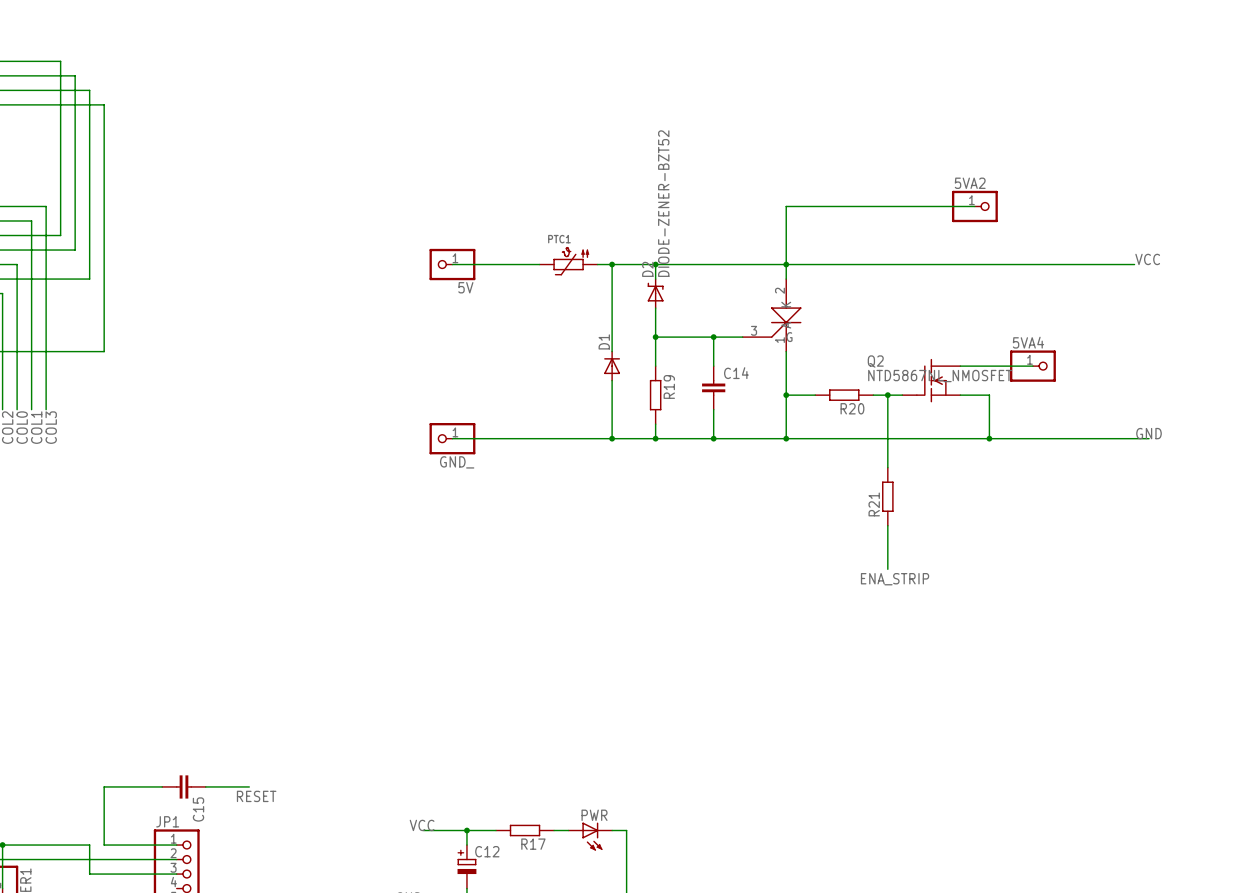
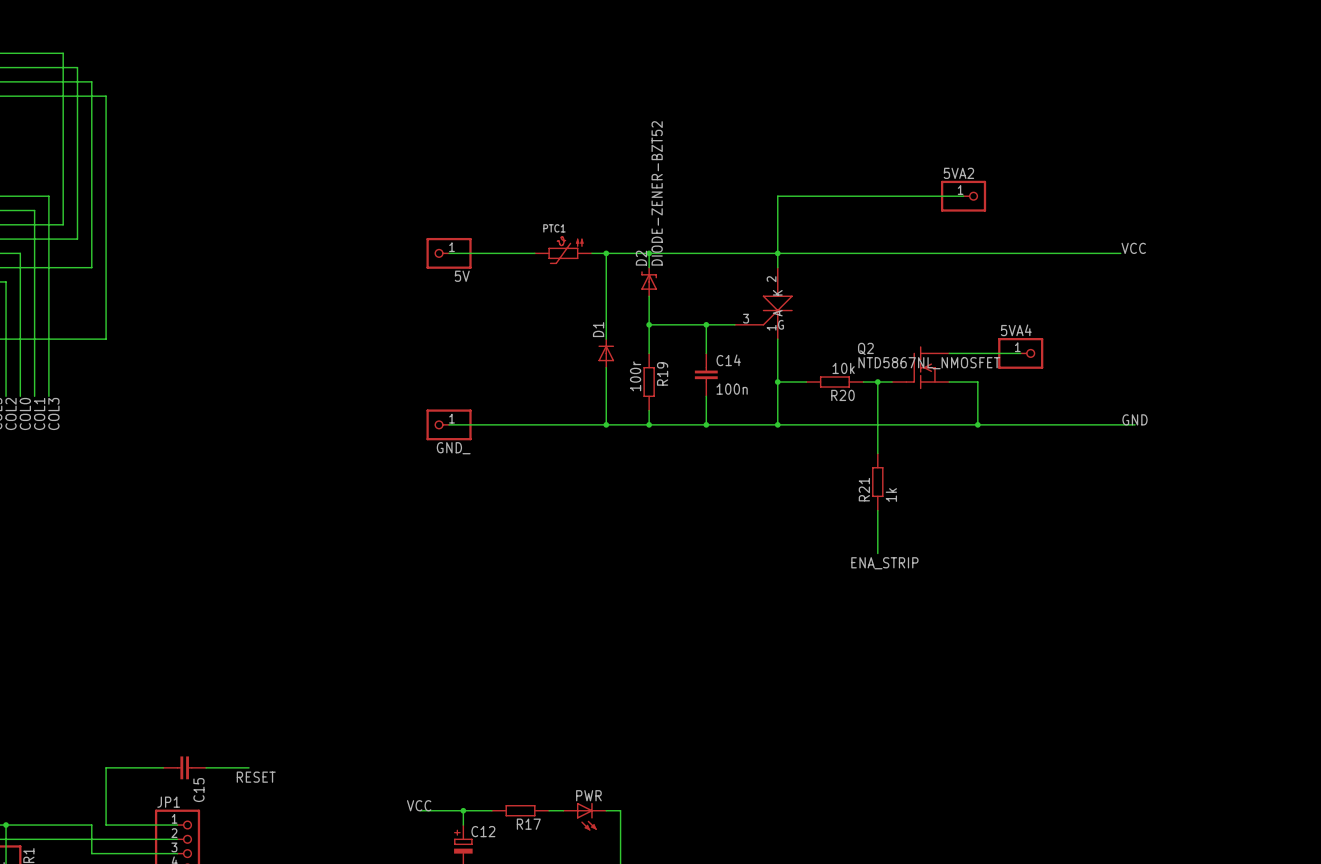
R20 value: none -> 10k (843, 368)
R19 value: none -> 100r (635, 376)
C14 value: none -> 100n (732, 389)
R21 value: none -> 1k (891, 495)

